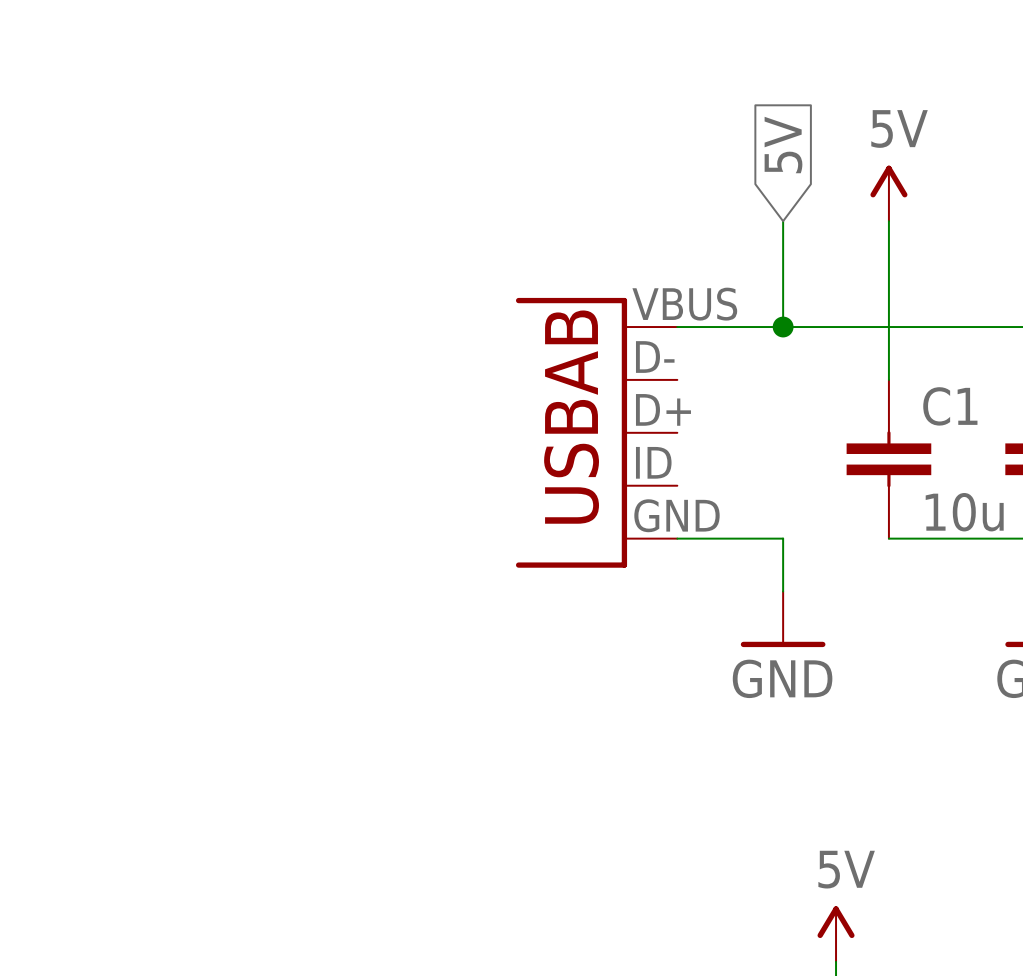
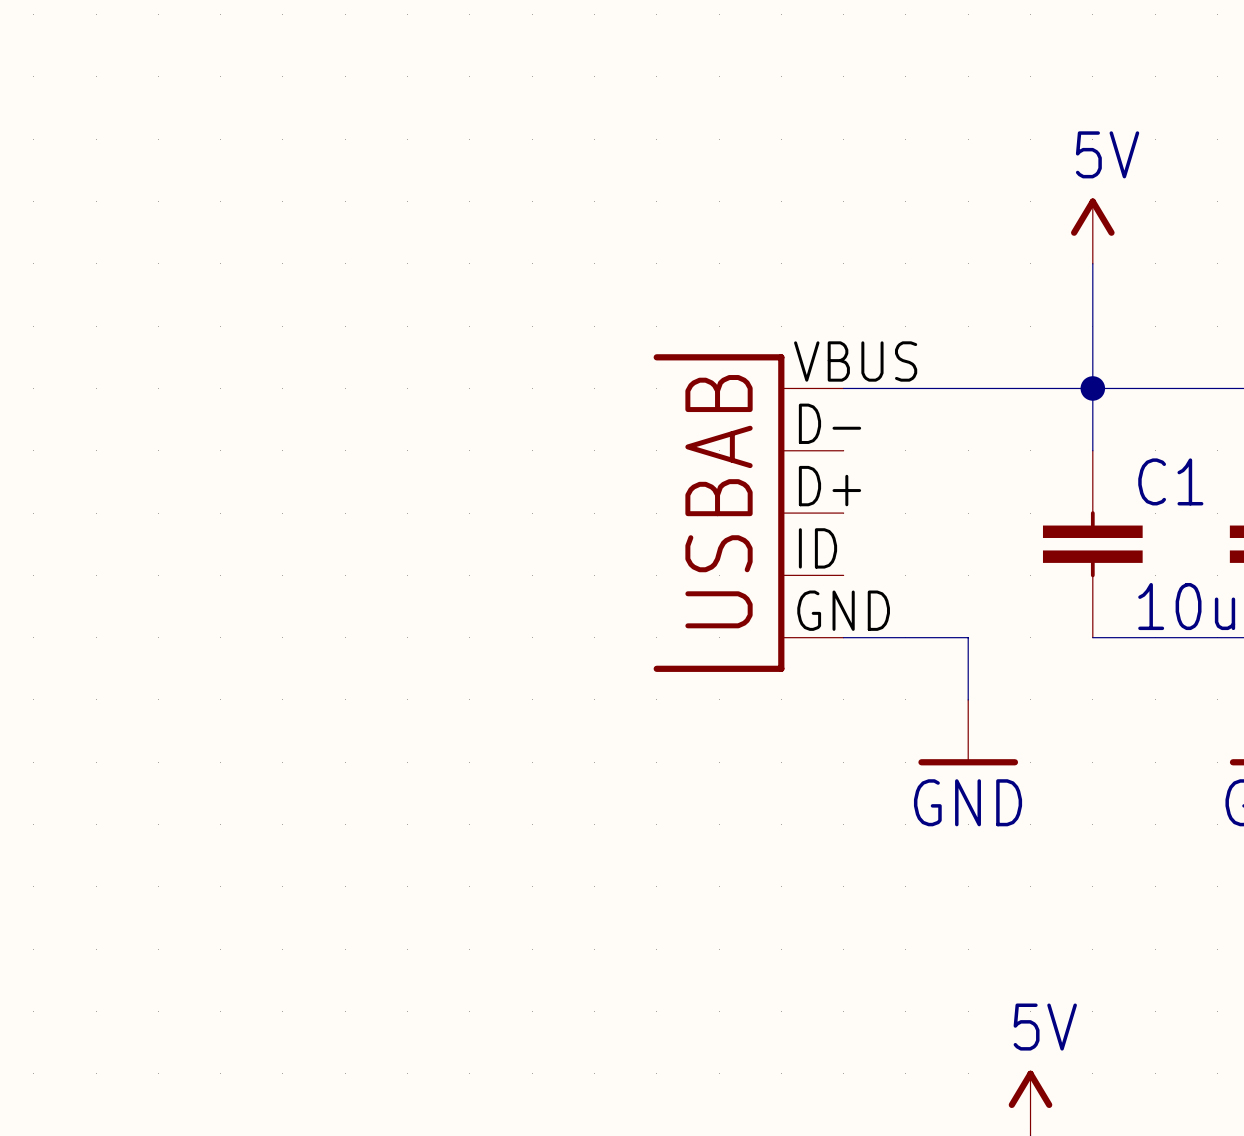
global label: 5V (783, 145) -> none
wire: (783, 221) (783, 327) -> none
junction position: (783, 327) -> (1092, 388)

